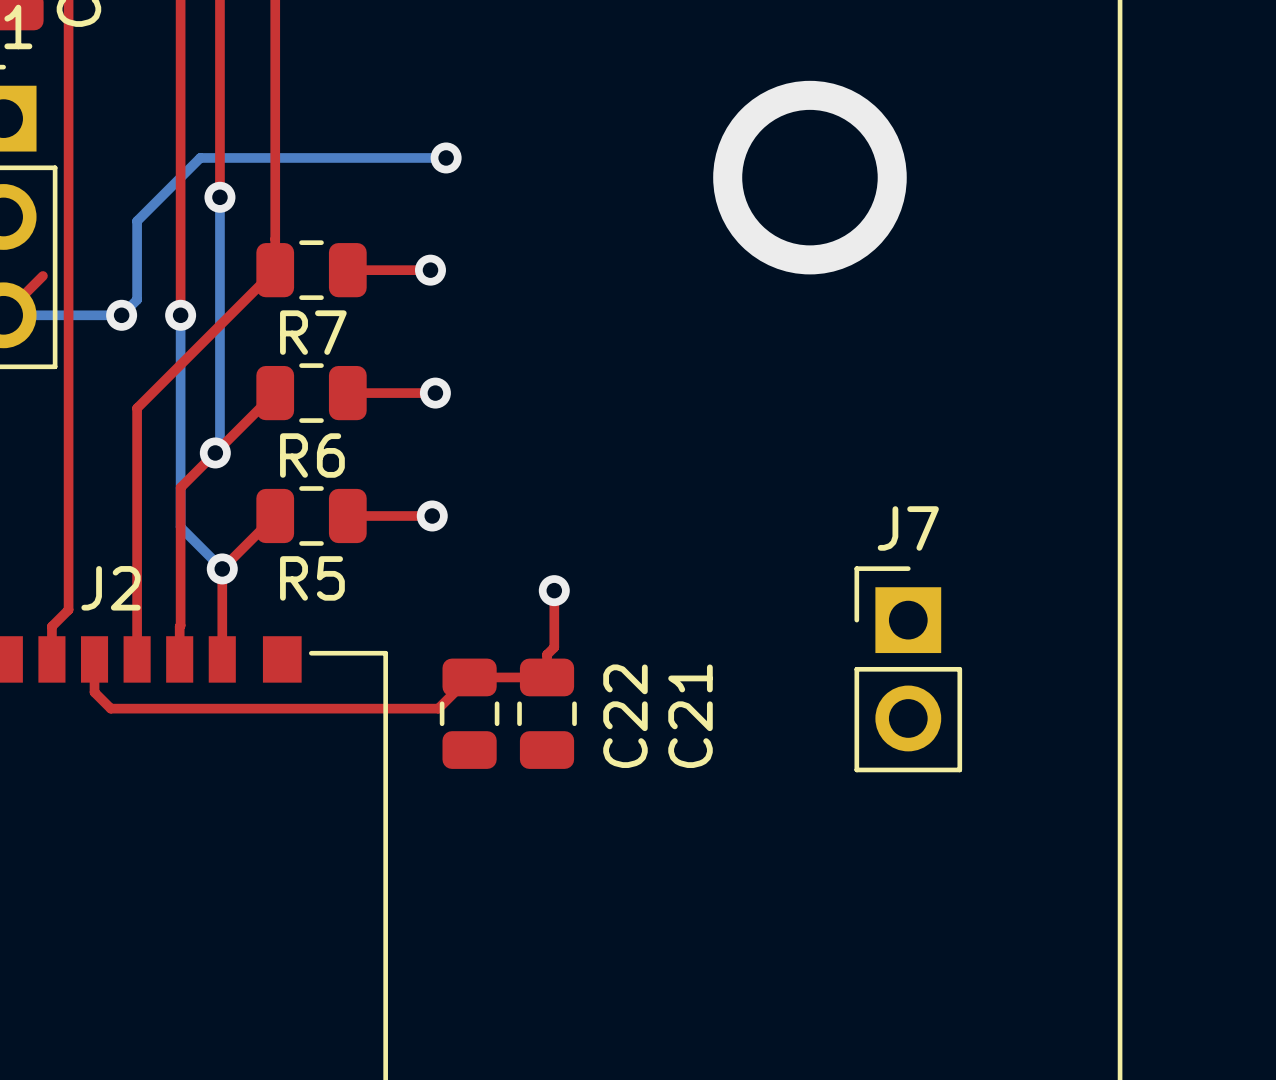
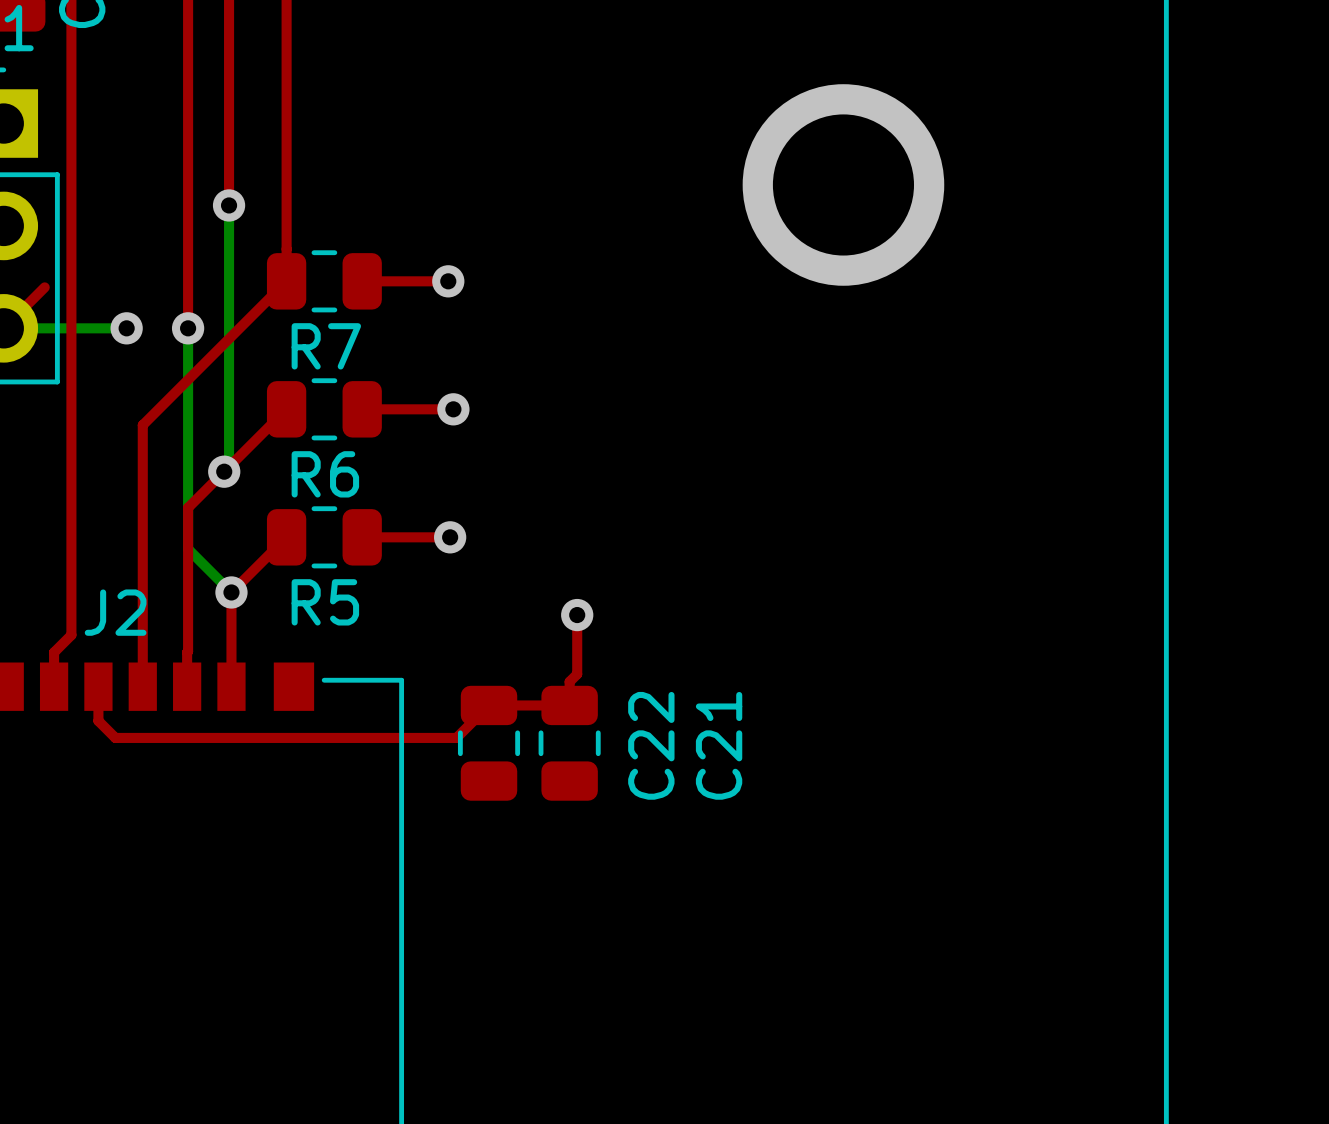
bottom track: (446, 157) (200, 157) (137, 221) (137, 299) (121, 315) -> none
via: (446, 157) -> none
J7: (908, 669) -> none

